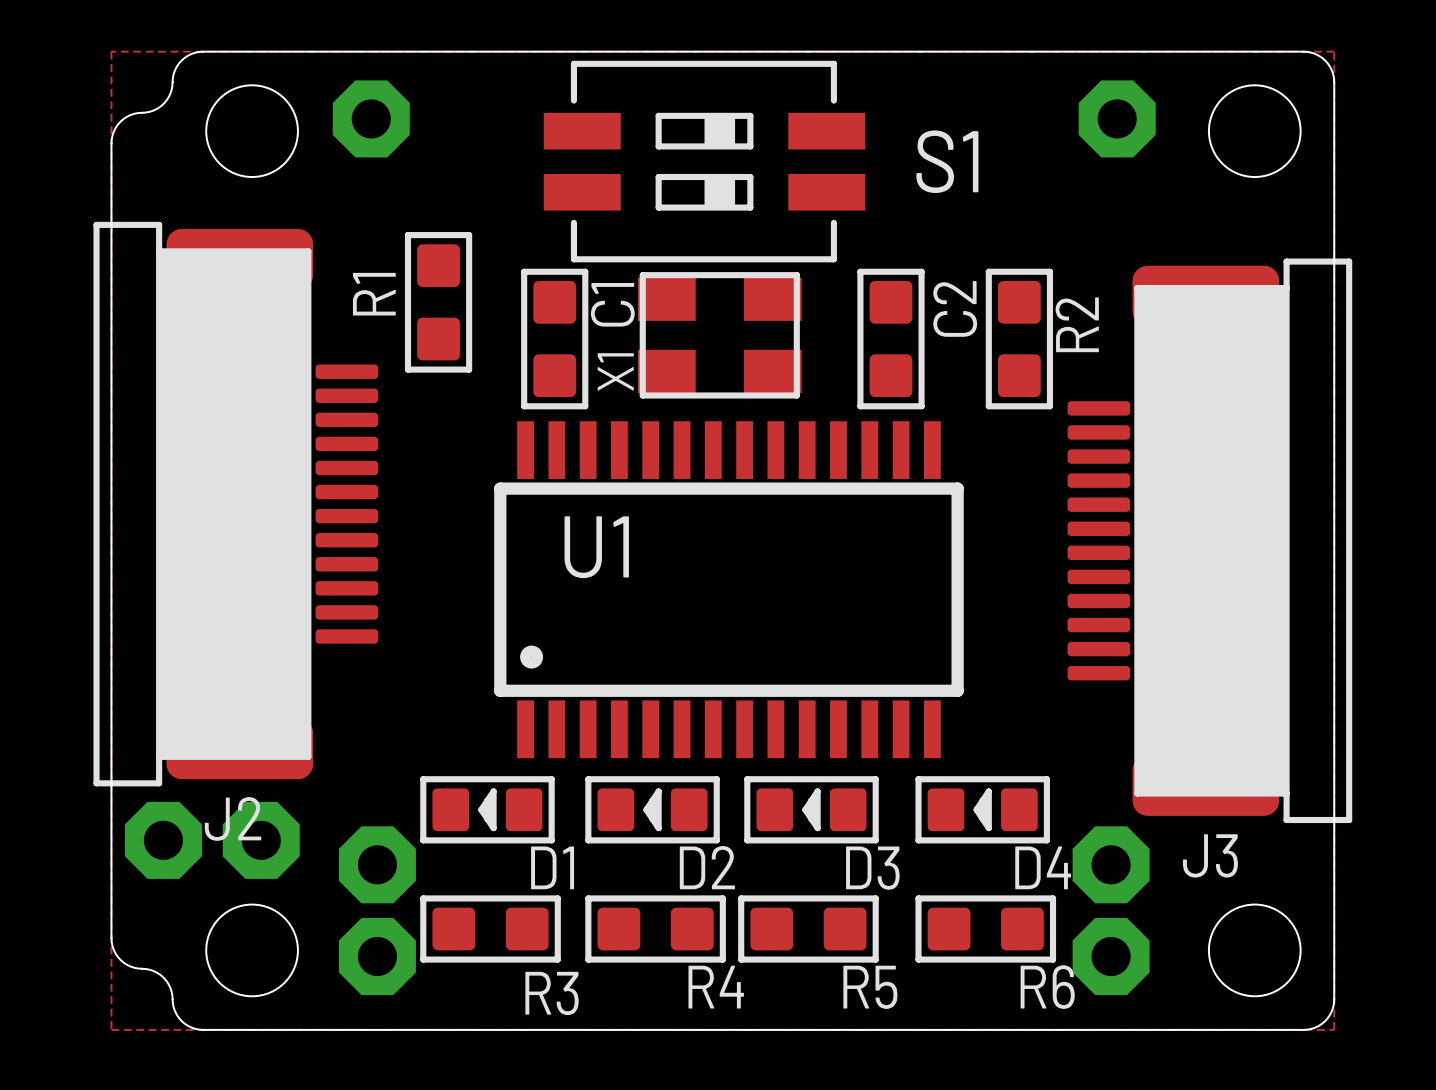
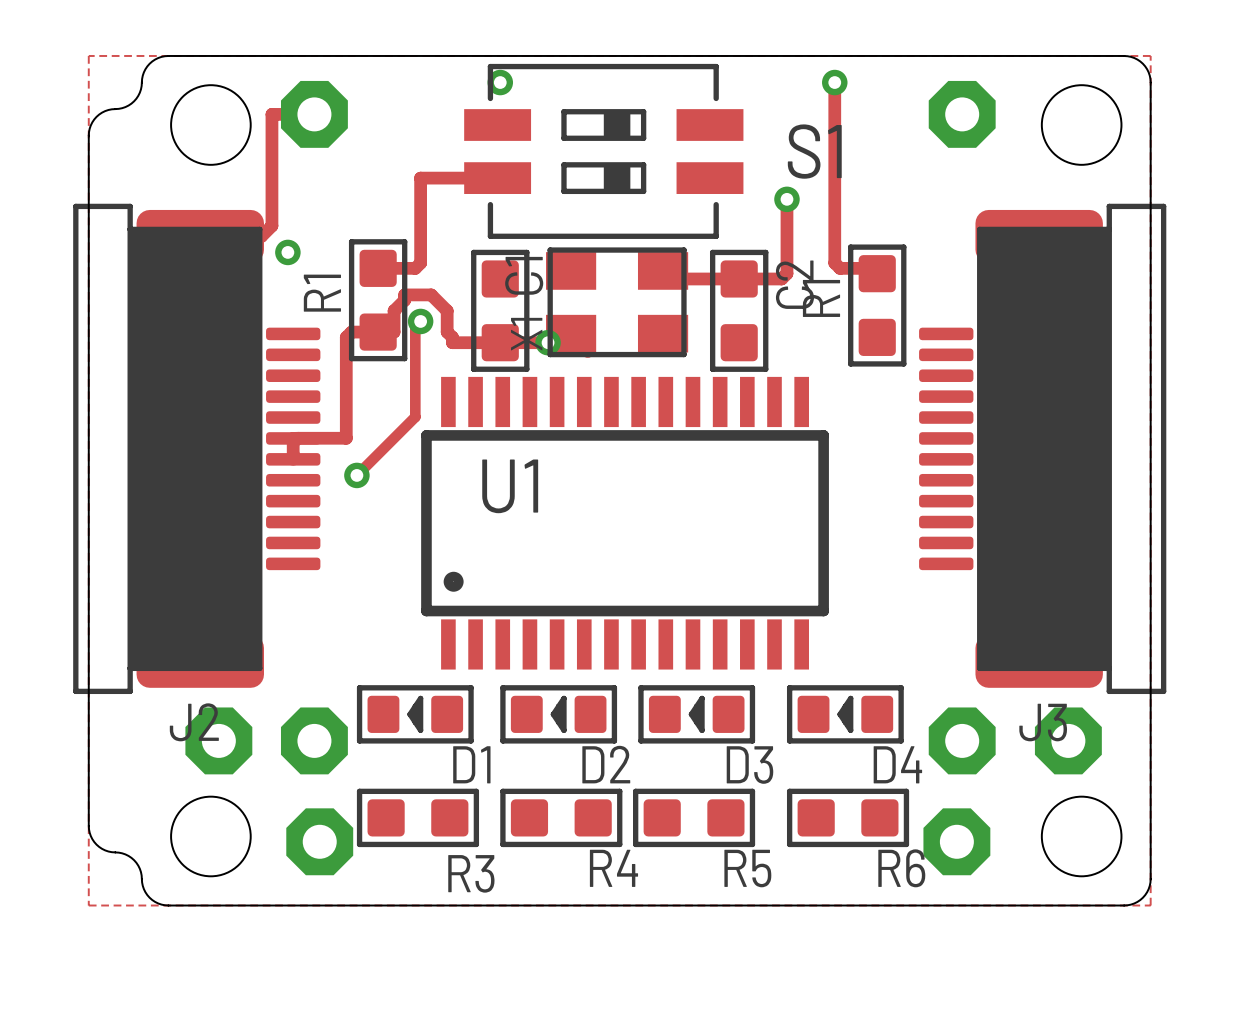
via: none -> (500, 82)
track: none -> (834, 82) (834, 263) (840, 268) (866, 268)
via: none -> (834, 82)
track: none -> (314, 114) (271, 114) (271, 225) (261, 236) (200, 236)
track: none -> (497, 178) (420, 178) (420, 263) (415, 268) (378, 268)
track: none -> (786, 199) (786, 273) (781, 278) (648, 278) (650, 259)
via: none -> (786, 199)
via: none -> (287, 252)
R1 position: (438, 302) -> (378, 300)
R2 name: R2 (1077, 324) -> R1 (821, 298)
C1 position: (554, 339) -> (500, 310)
C2 position: (890, 339) -> (739, 310)
track: none -> (420, 321) (415, 326) (415, 417) (356, 475)
via: none -> (420, 321)
via: none -> (548, 342)
track: none -> (587, 351) (585, 342) (452, 342) (452, 337) (447, 332) (447, 310) (431, 294) (404, 294) (404, 300) (394, 310) (394, 332) (351, 332) (346, 337) (346, 438) (293, 438) (293, 459)
via: none -> (356, 475)
J3 position: (1209, 540) -> (1042, 448)
part position: (163, 840) -> (1068, 740)
part position: (377, 864) -> (314, 740)
part position: (1111, 864) -> (962, 740)

